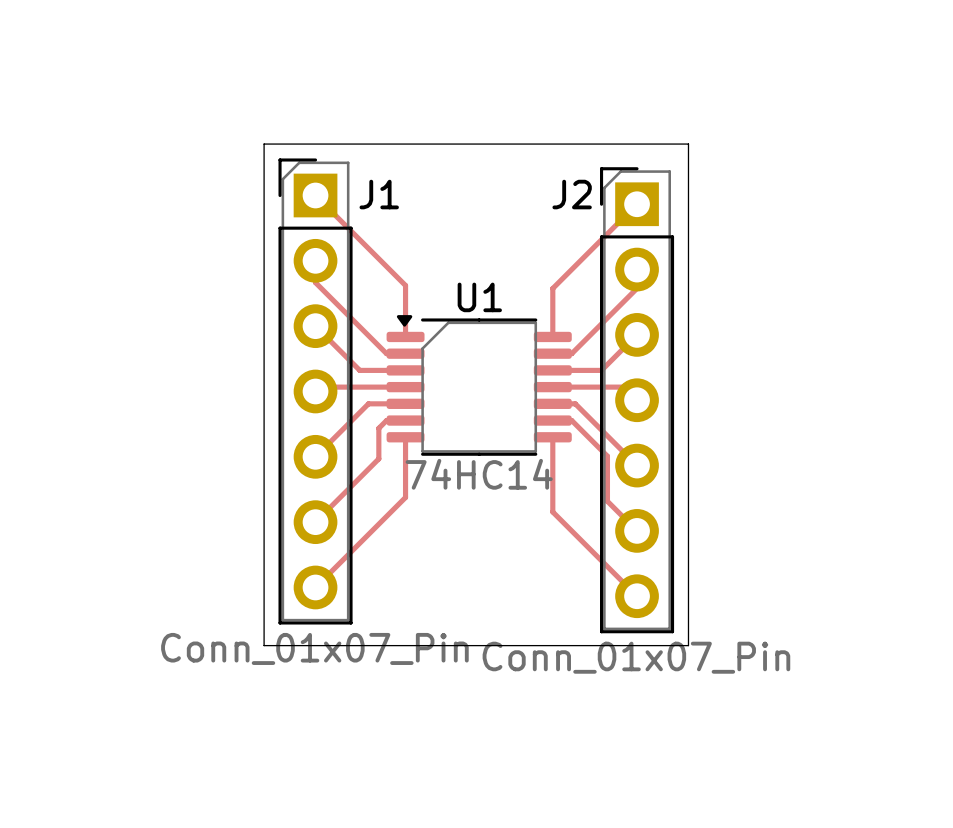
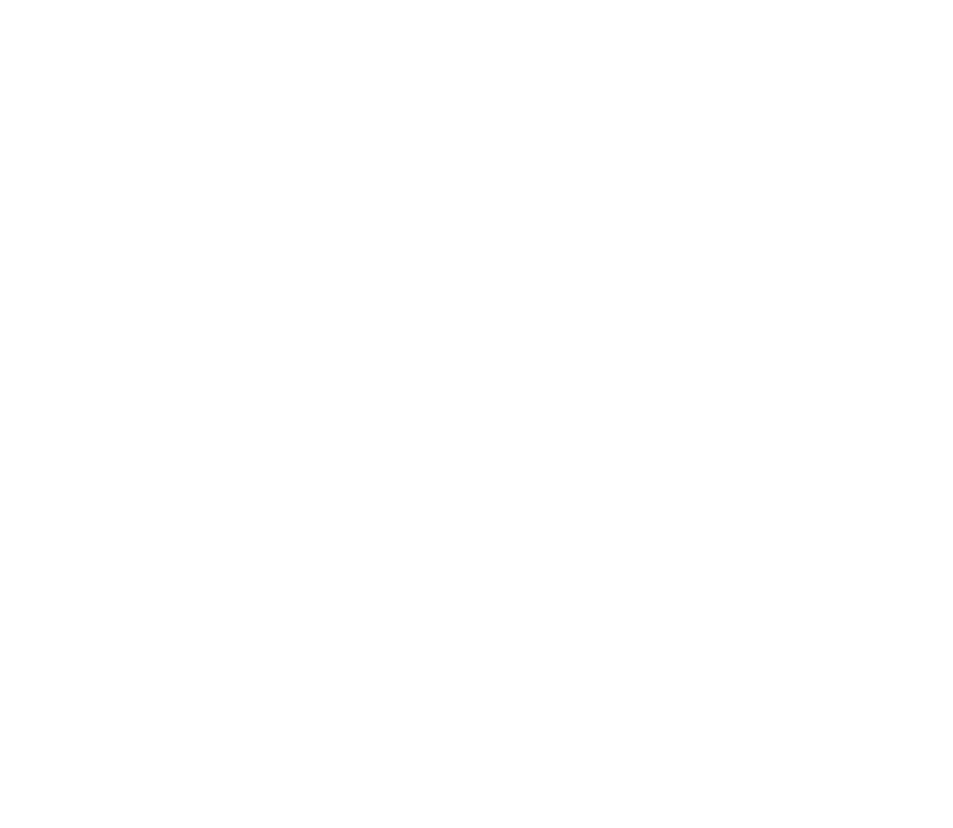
board edge: (264, 144) (264, 645) (688, 645) (688, 144) (264, 144) -> none
top track: (315, 195) (405, 285) (405, 336) -> none
top track: (637, 204) (552, 288) (552, 336) -> none
top track: (315, 260) (315, 282) (386, 353) (405, 353) -> none
top track: (637, 269) (637, 288) (571, 353) (552, 353) -> none
top track: (315, 326) (359, 370) (405, 370) -> none
top track: (637, 334) (601, 370) (552, 370) -> none
U1: 74HC14 (479, 385) -> none
top track: (405, 387) (319, 387) (315, 391) -> none
top track: (552, 387) (623, 387) (637, 400) -> none
J1: Conn_01x07_Pin (315, 391) -> none
J2: Conn_01x07_Pin (637, 400) -> none
top track: (405, 403) (368, 403) (315, 456) -> none
top track: (552, 403) (575, 403) (637, 465) -> none
top track: (405, 420) (386, 420) (378, 428) (378, 458) (315, 522) -> none
top track: (552, 420) (571, 420) (607, 456) (607, 501) (637, 530) -> none
top track: (405, 437) (405, 497) (315, 587) -> none
top track: (552, 437) (552, 511) (637, 596) -> none

